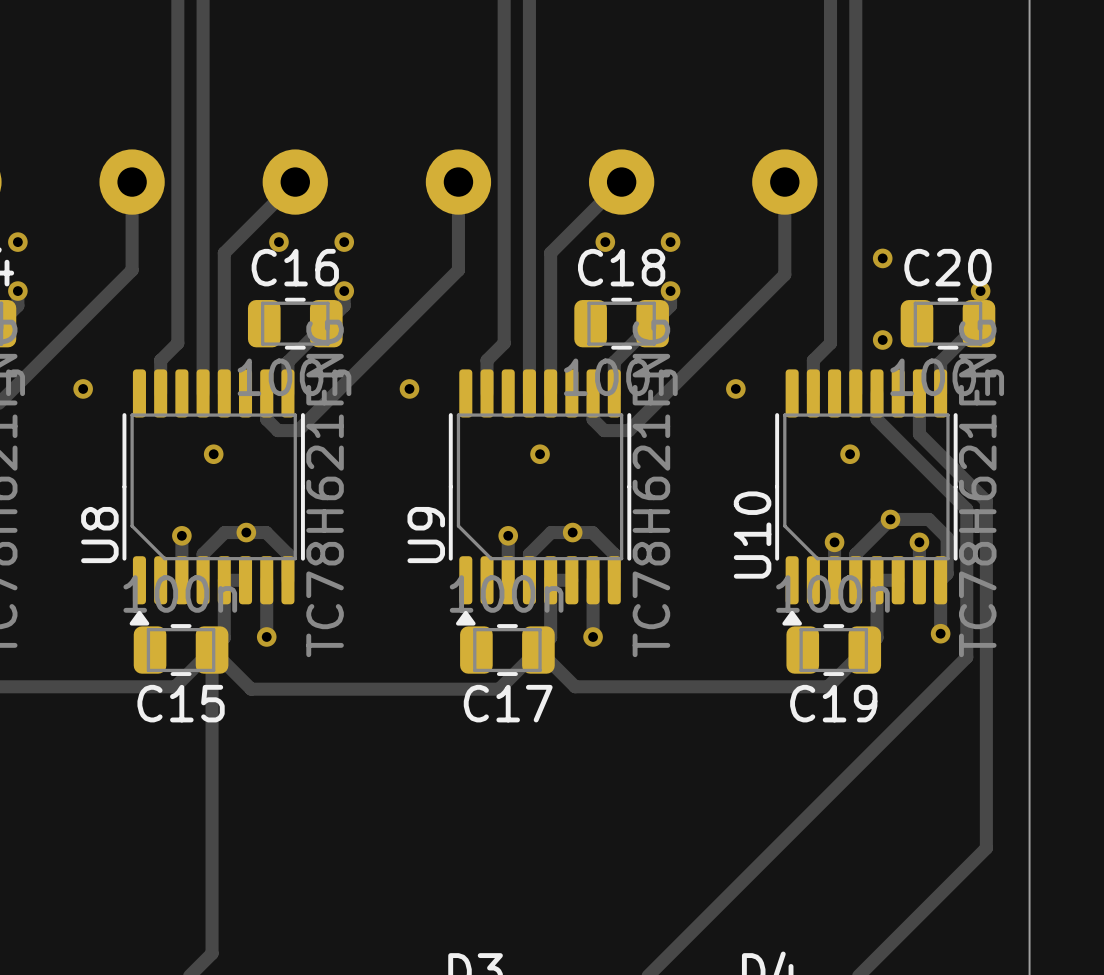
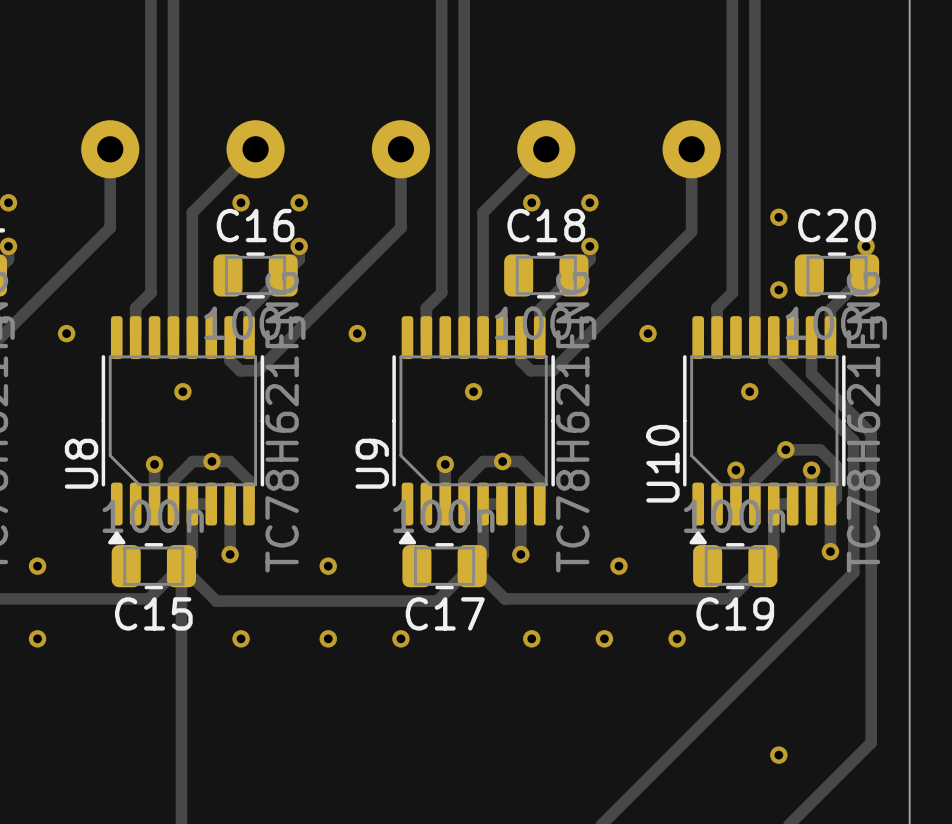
via: none -> (37, 566)
via: none -> (328, 566)
via: none -> (618, 566)
via: none -> (37, 638)
via: none -> (241, 638)
via: none -> (328, 638)
via: none -> (400, 638)
via: none -> (531, 638)
via: none -> (604, 638)
via: none -> (677, 638)
via: none -> (778, 755)

